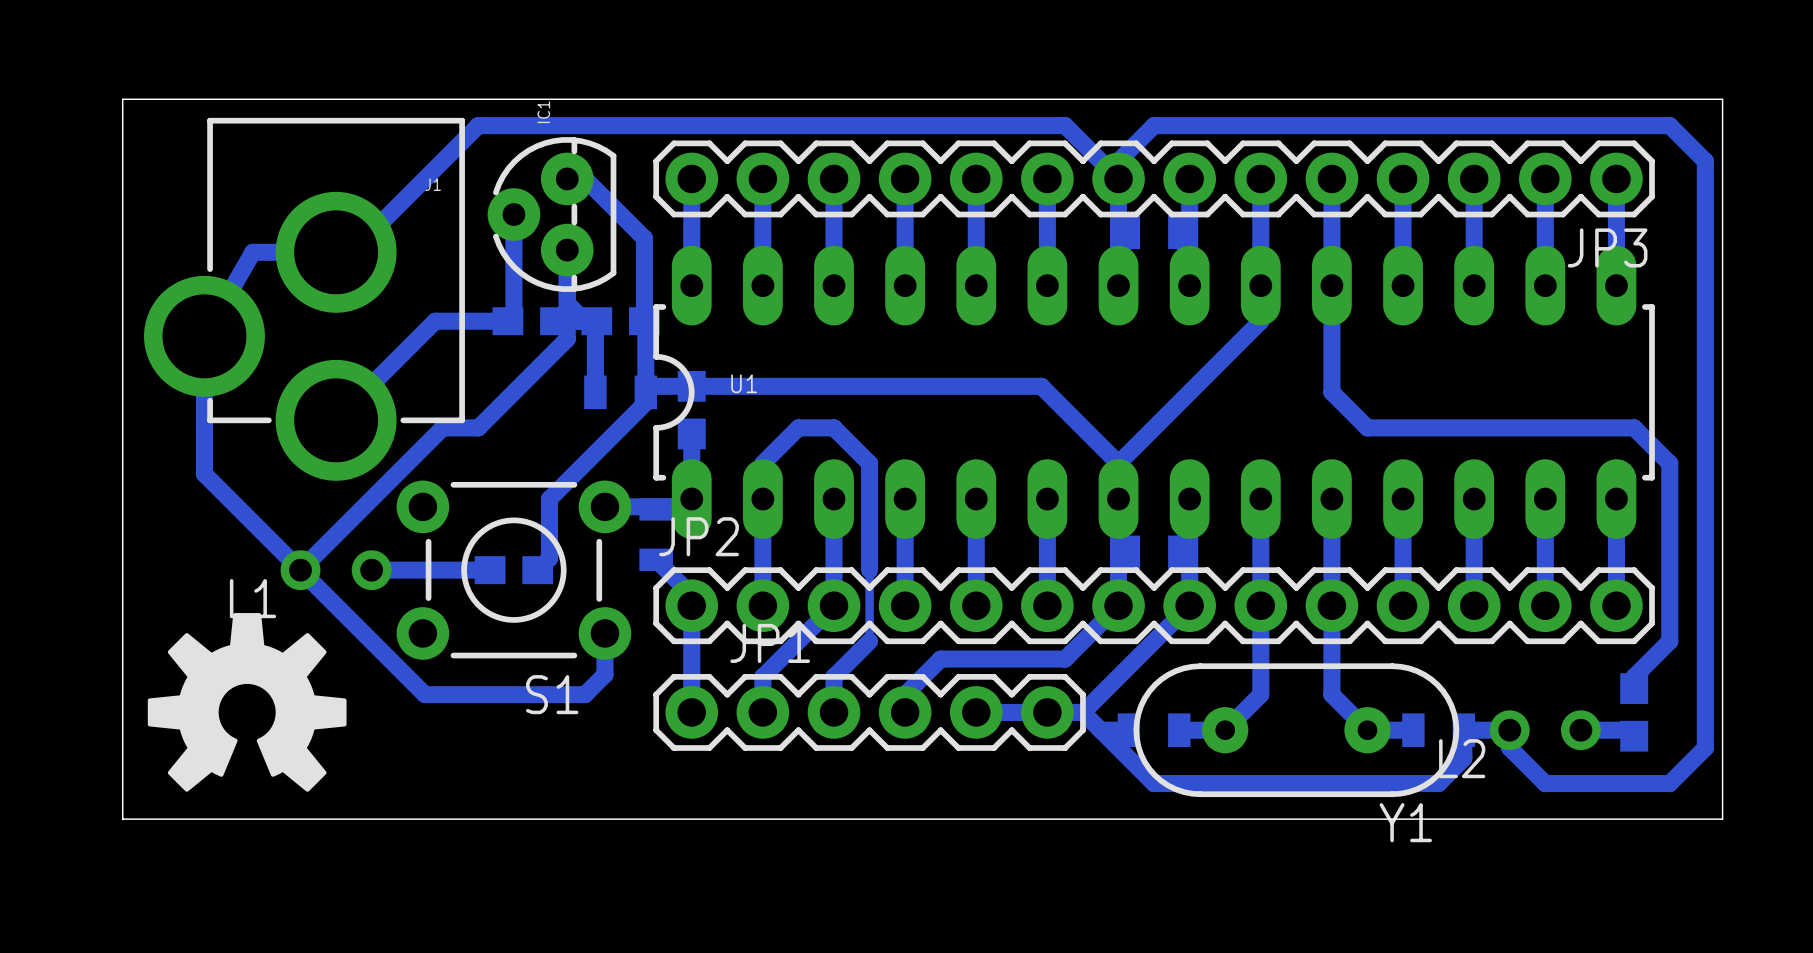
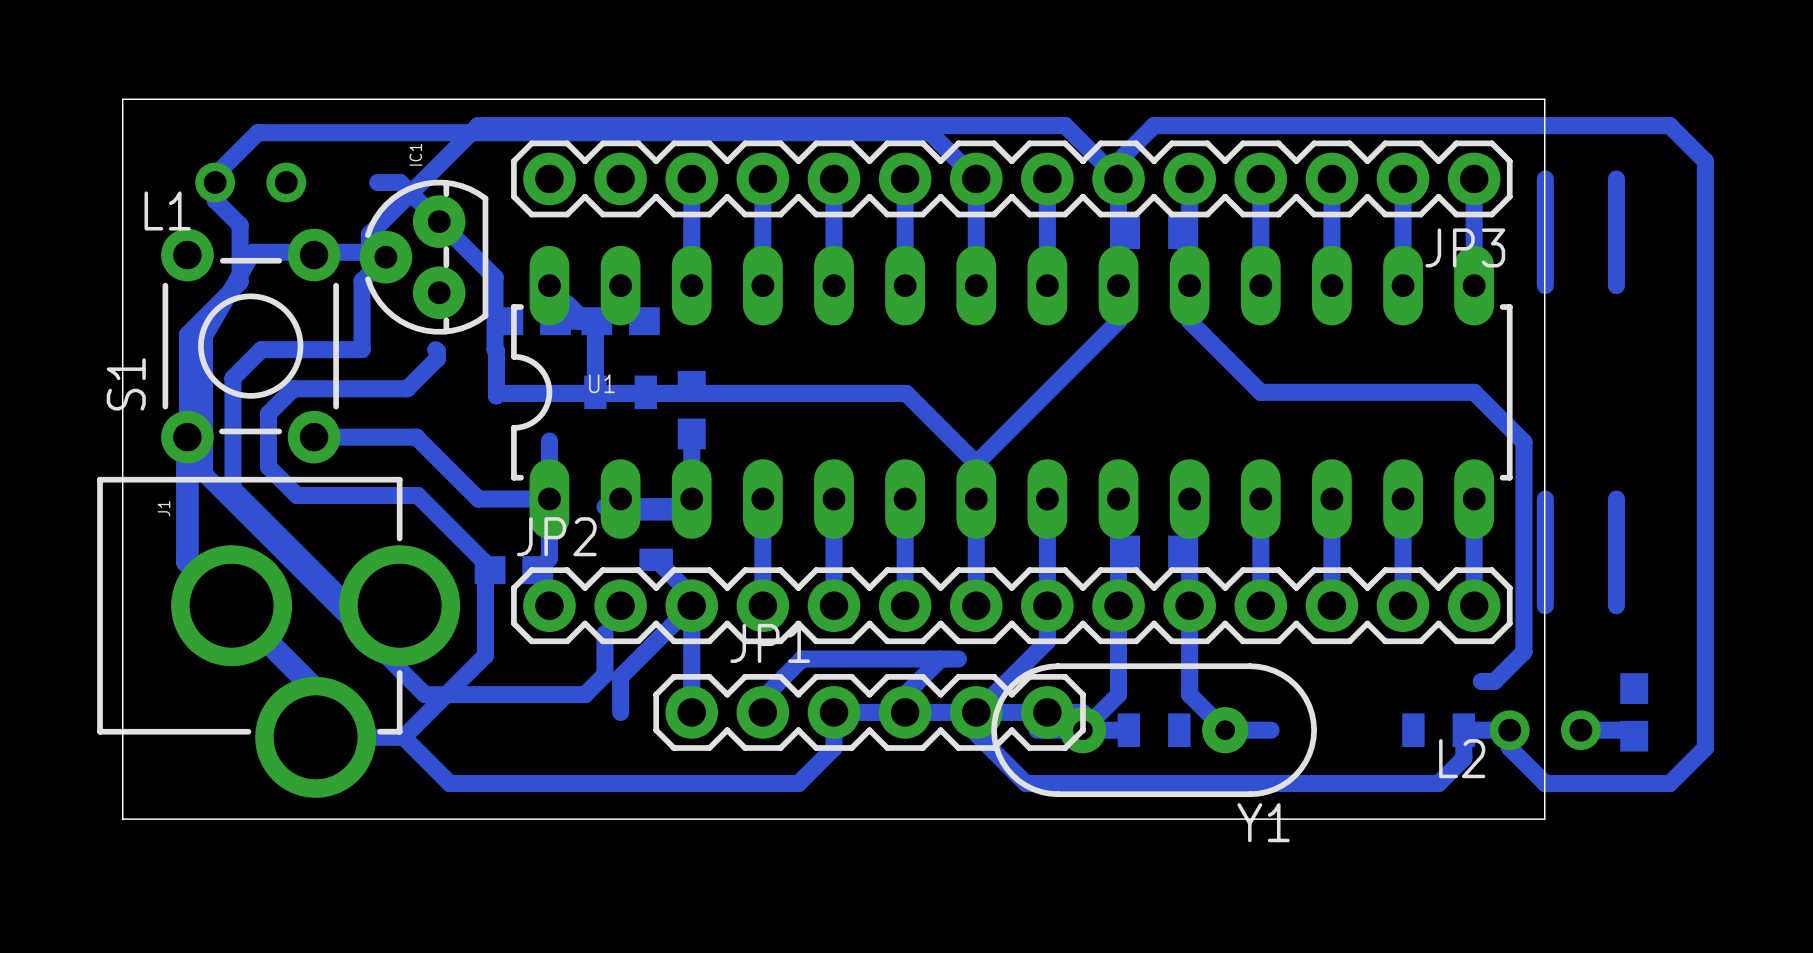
board edge: (1544, 99) (1722, 99) (1722, 819) (1544, 819) -> (1544, 99) (1544, 819)
bottom track: (567, 178) (585, 178) (644, 238) (645, 402) (549, 499) -> none
bottom track: none -> (976, 178) (930, 132) (257, 132) (215, 175) (215, 200) (240, 225) (240, 282) (187, 334) (187, 561) (315, 689) (315, 737) (403, 737)
JP3 position: (1154, 178) -> (1011, 178)
bottom track: none -> (377, 182) (400, 182) (495, 277) (496, 395) (498, 393) (906, 393) (976, 463)
bottom track: (513, 214) (513, 315) (507, 321) (435, 321) (336, 420) -> none
IC1 position: (551, 214) -> (423, 257)
bottom track: (567, 250) (567, 338) (478, 427) (442, 427) (300, 570) -> none
bottom track: none -> (385, 257) (362, 280) (362, 349) (261, 349) (232, 378) (232, 488) (350, 605) (399, 605)
bottom track: none -> (1189, 285) (1189, 321) (1260, 392) (1474, 392) (1523, 442) (1523, 651) (1494, 681) (1481, 681)
bottom track: (1260, 285) (1260, 321) (1118, 463) -> (1118, 285) (1118, 321) (976, 463)
bottom track: (1331, 285) (1331, 392) (1367, 427) (1634, 427) (1669, 463) (1669, 641) (1634, 676) (1634, 688) -> none
J1 rotation: 0° (304, 299) -> 90° counterclockwise (278, 637)
J1 position: (304, 299) -> (278, 637)
bottom track: none -> (435, 349) (437, 358) (407, 388) (293, 388) (268, 413) (268, 467) (296, 495) (417, 495) (485, 563) (485, 655) (403, 737)
bottom track: (645, 392) (651, 386) (1041, 386) (1118, 463) -> none
U1 position: (1154, 392) -> (1011, 392)
bottom track: none -> (314, 437) (416, 437) (478, 499) (549, 499) (549, 441)
bottom track: (762, 499) (762, 463) (798, 427) (834, 427) (869, 463) (869, 641) (834, 676) (834, 712) -> none
L1 position: (336, 570) -> (250, 182)
bottom track: (371, 570) (490, 570) -> none
S1 rotation: 0° (513, 570) -> 90° clockwise (250, 346)
S1 position: (513, 570) -> (250, 346)
bottom track: none -> (691, 605) (620, 676) (620, 712)
bottom track: (834, 605) (762, 676) (762, 698) -> (940, 659) (801, 659) (762, 698)
bottom track: none -> (1047, 605) (1047, 641) (986, 701) (986, 729)
bottom track: (1118, 605) (1065, 659) (958, 659) -> (1118, 605) (1118, 694) (1082, 730) (1037, 730)
JP2 position: (1154, 605) -> (1011, 605)
bottom track: (1189, 605) (1082, 712) (1154, 783) -> (1189, 605) (1189, 694) (1225, 730) (1271, 730)
bottom track: (1260, 605) (1260, 694) (1225, 730) (1179, 730) -> none
bottom track: (1331, 605) (1331, 694) (1367, 730) (1413, 730) -> none
drawing: [147, 613, 347, 792] -> none
bottom track: none -> (954, 712) (1026, 783) (1154, 783)
bottom track: none -> (976, 712) (834, 712) (834, 747) (798, 783) (449, 783) (403, 737)
Y1 position: (1296, 730) -> (1154, 730)

